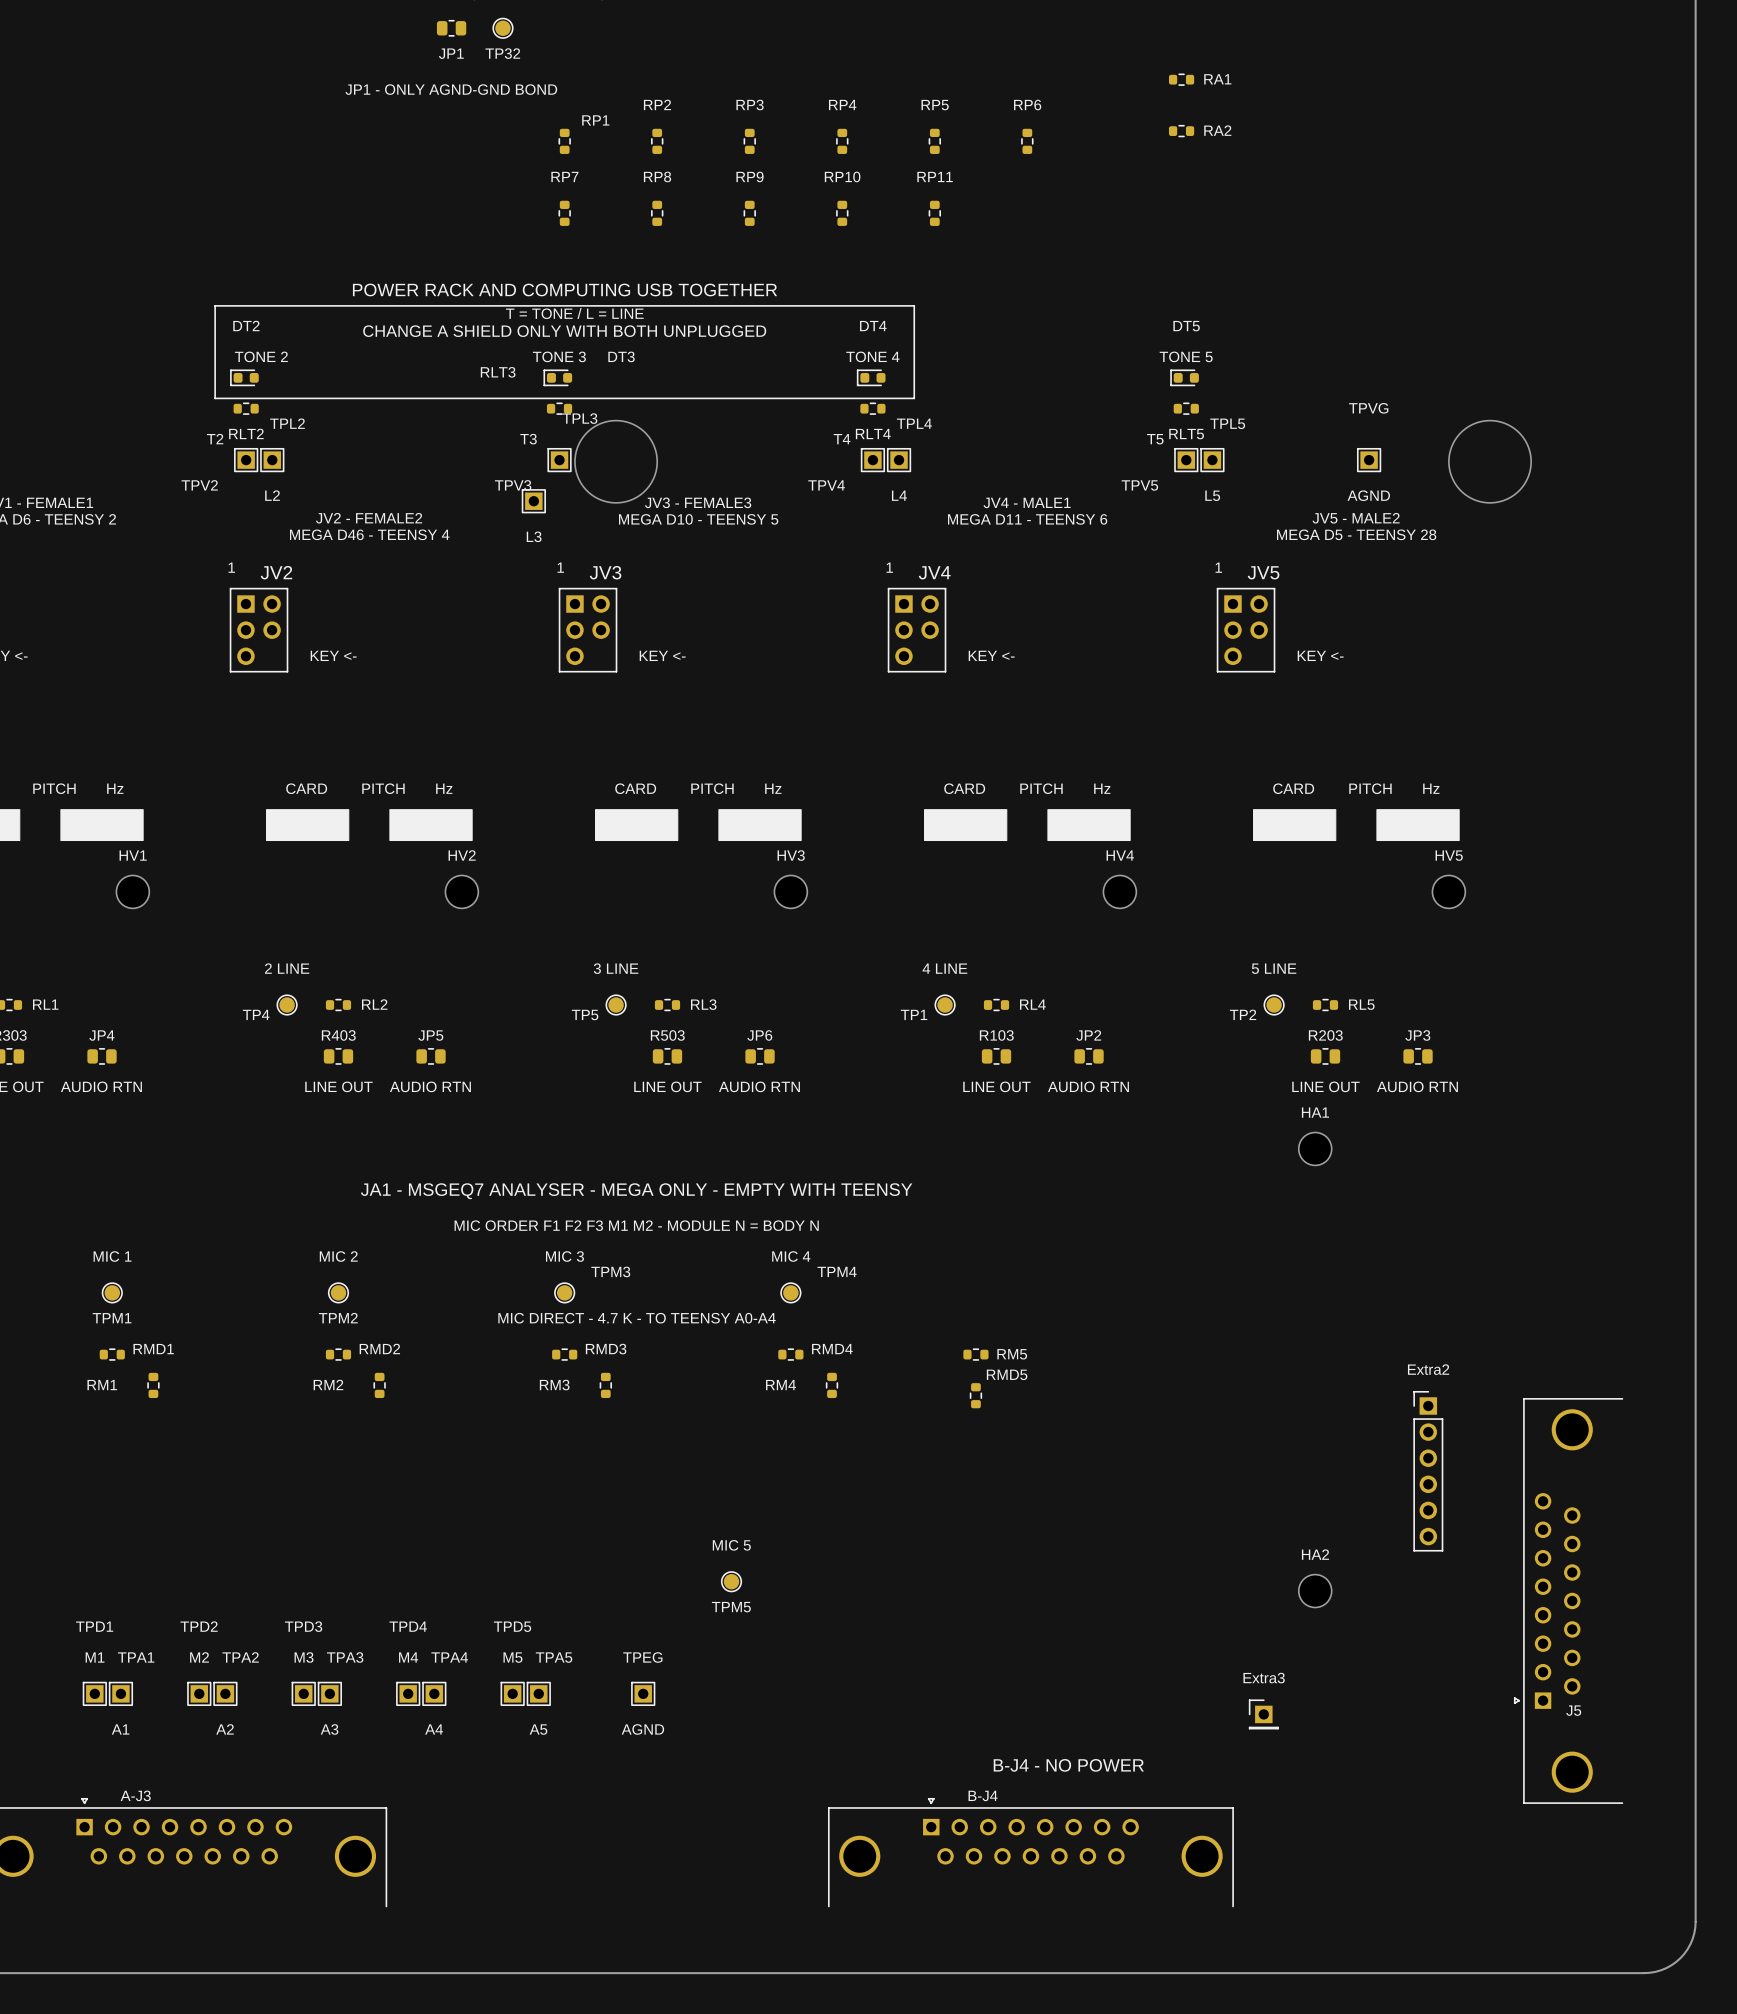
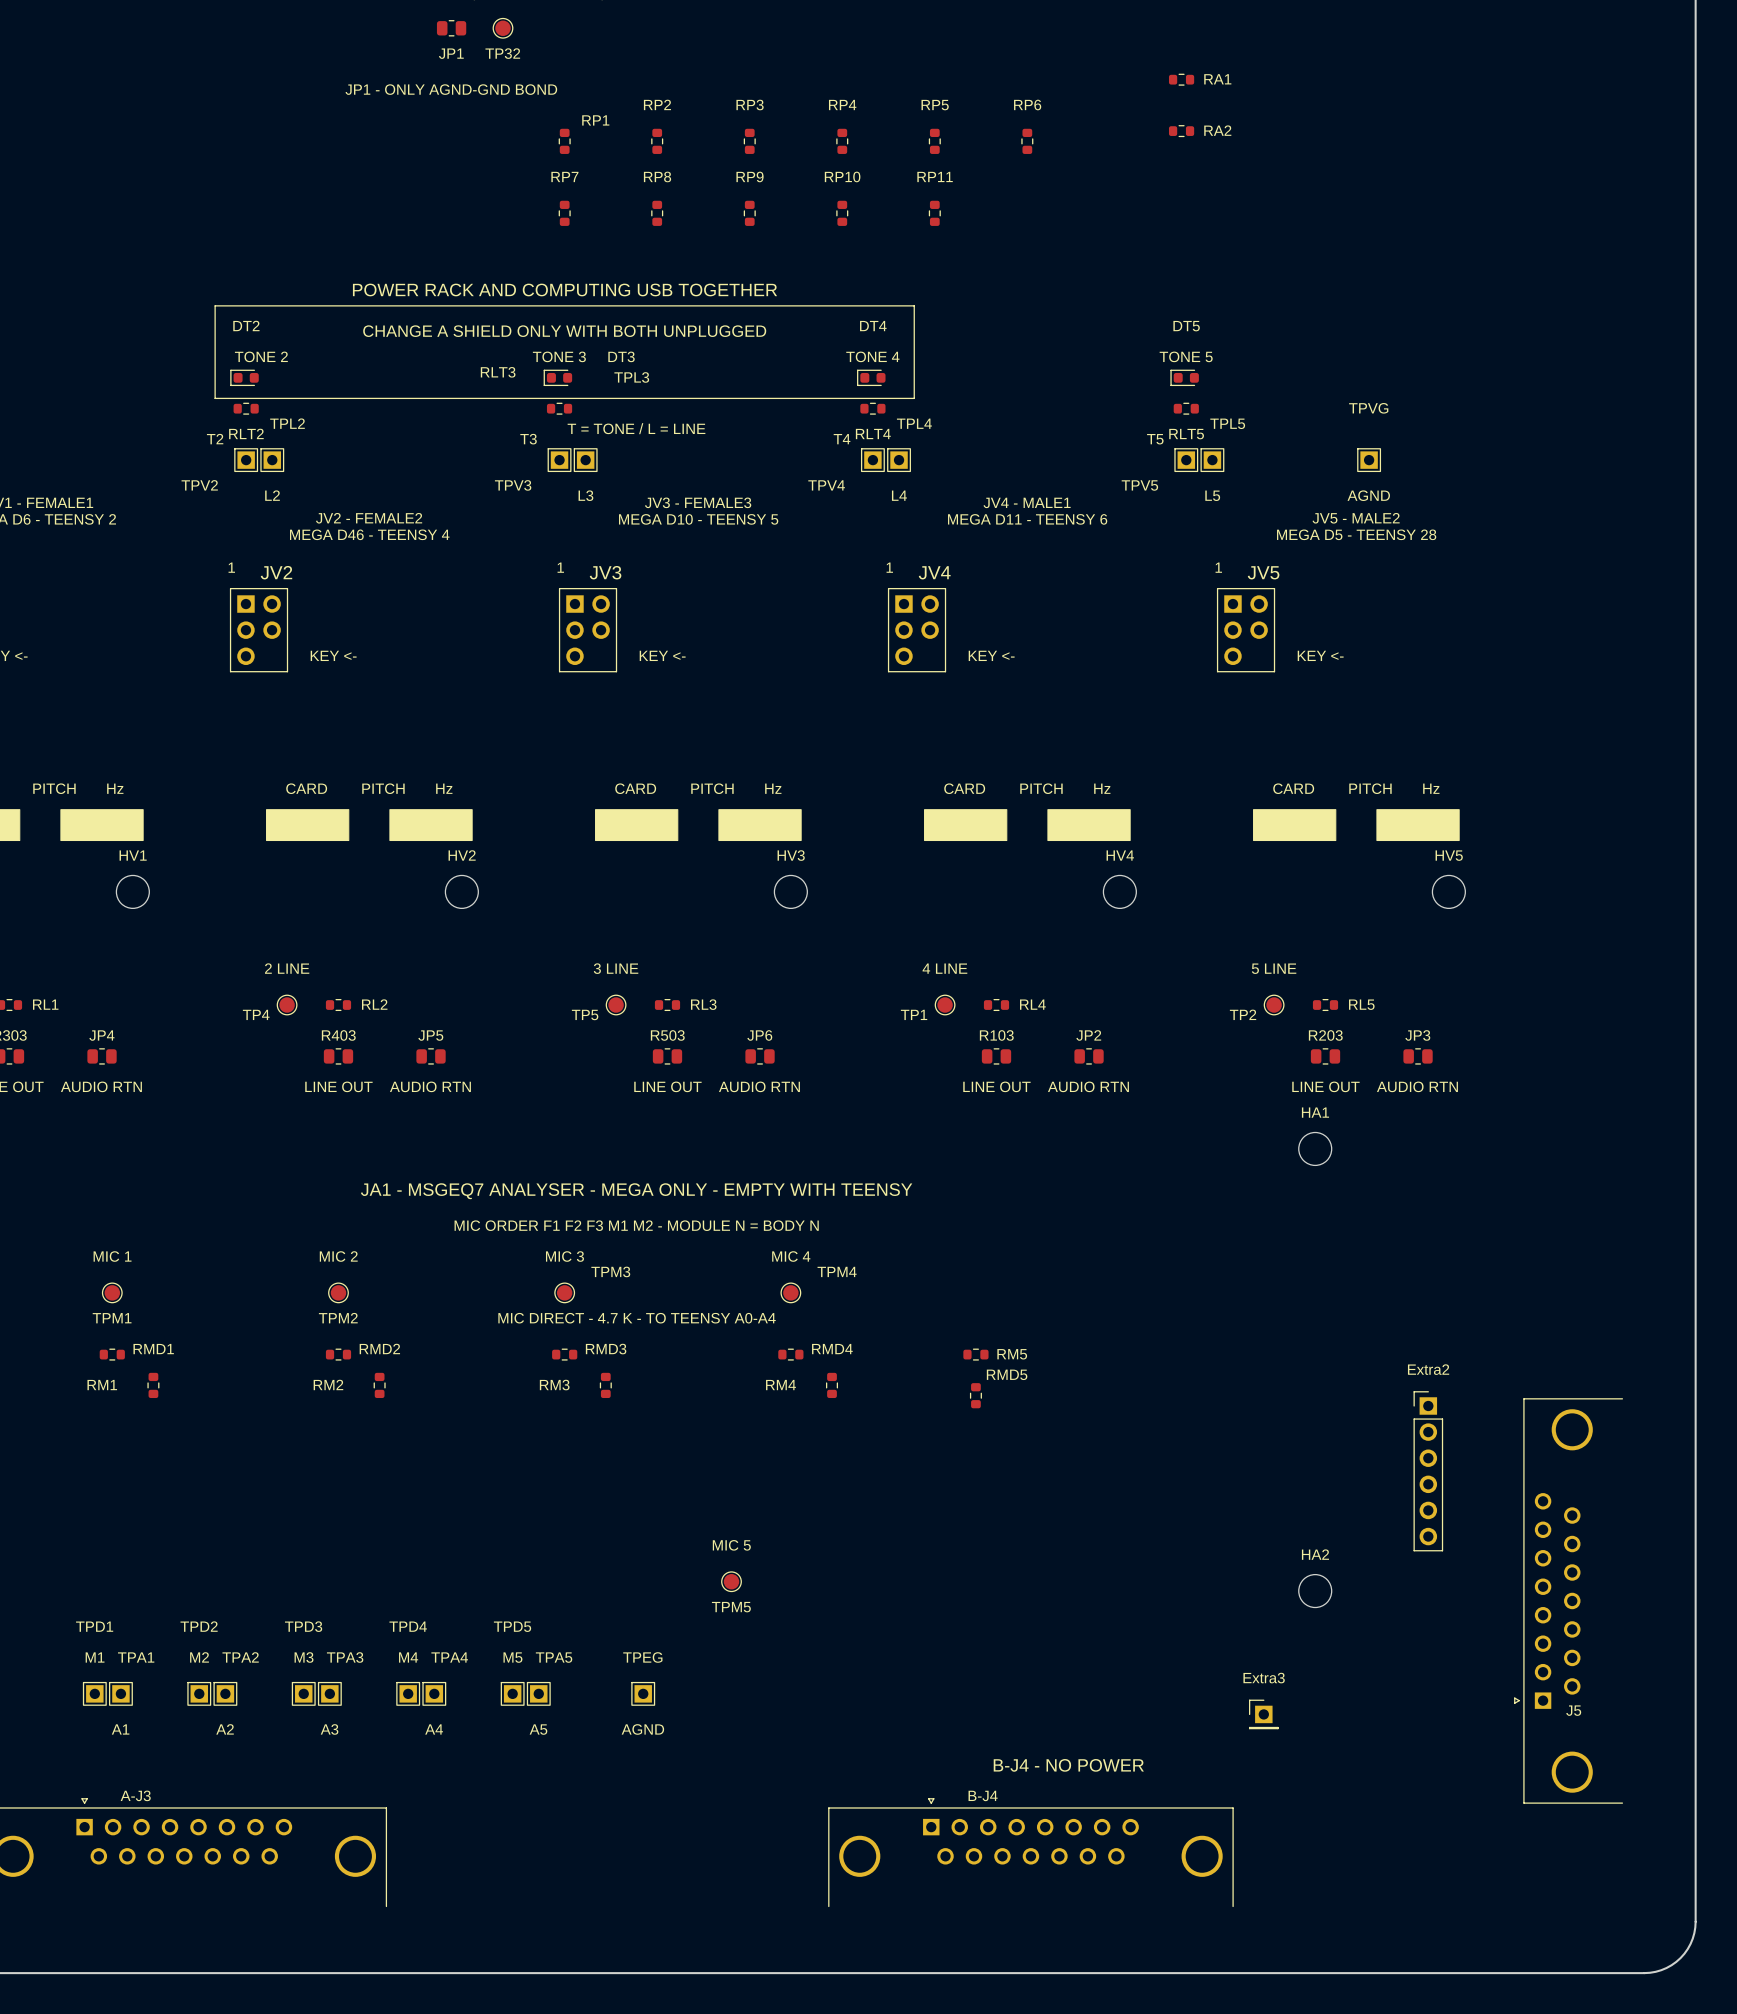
text position: T = TONE / L = LINE (574, 313) -> T = TONE / L = LINE (636, 428)
round board edge: [574, 420, 658, 504] -> none
round board edge: [1448, 420, 1532, 504] -> none
TPL3 position: (533, 501) -> (585, 460)
text position: L3 (534, 536) -> L3 (585, 495)

